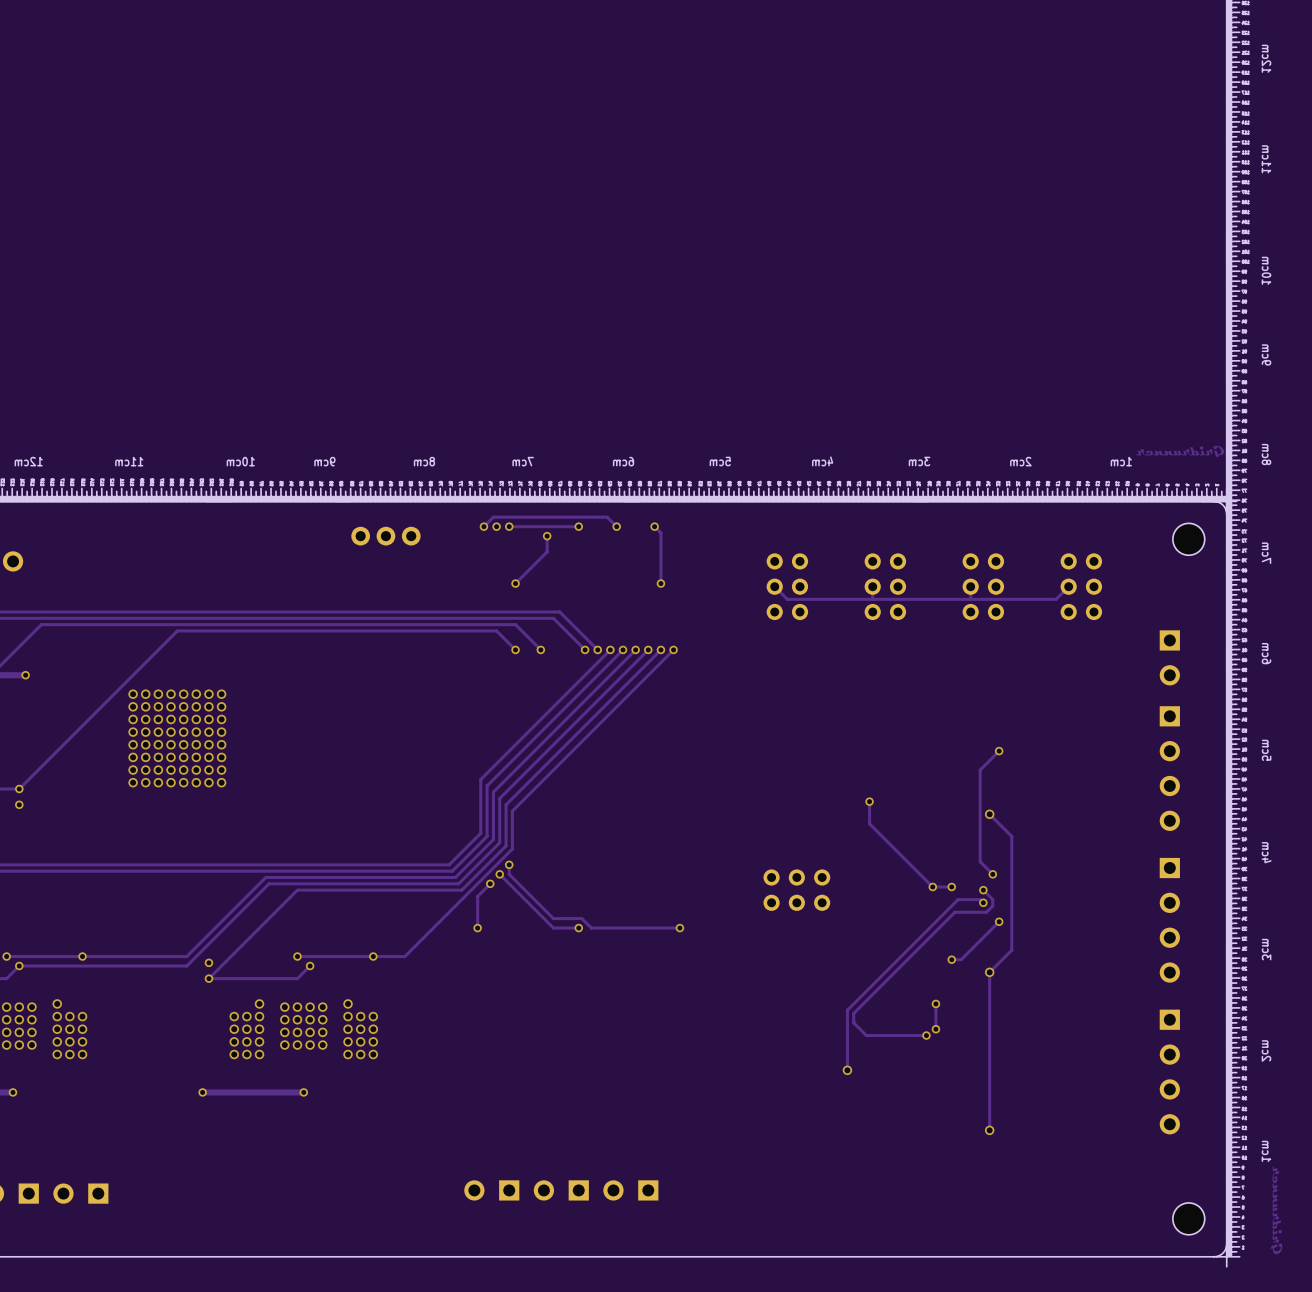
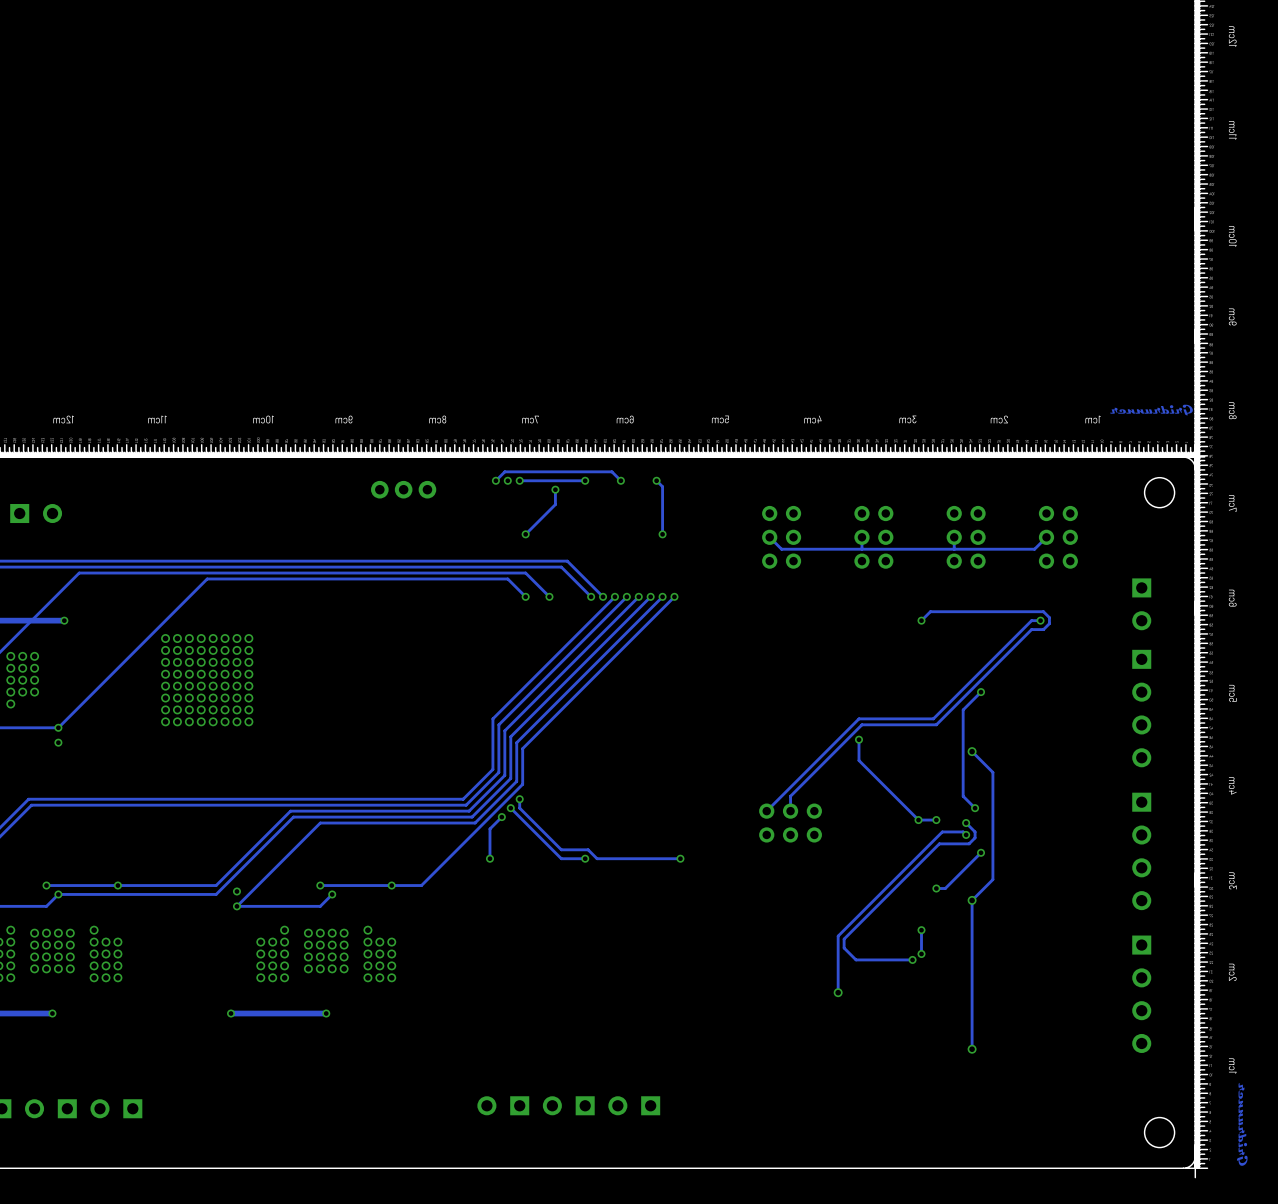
track: none -> (921, 620) (930, 611) (1043, 611) (1049, 617) (1049, 623) (1043, 629) (1031, 629) (936, 724) (861, 724) (790, 796) (790, 811)
via: none -> (921, 620)
track: none -> (1040, 620) (1031, 620) (933, 718) (859, 718) (766, 811)
via: none -> (1040, 620)

